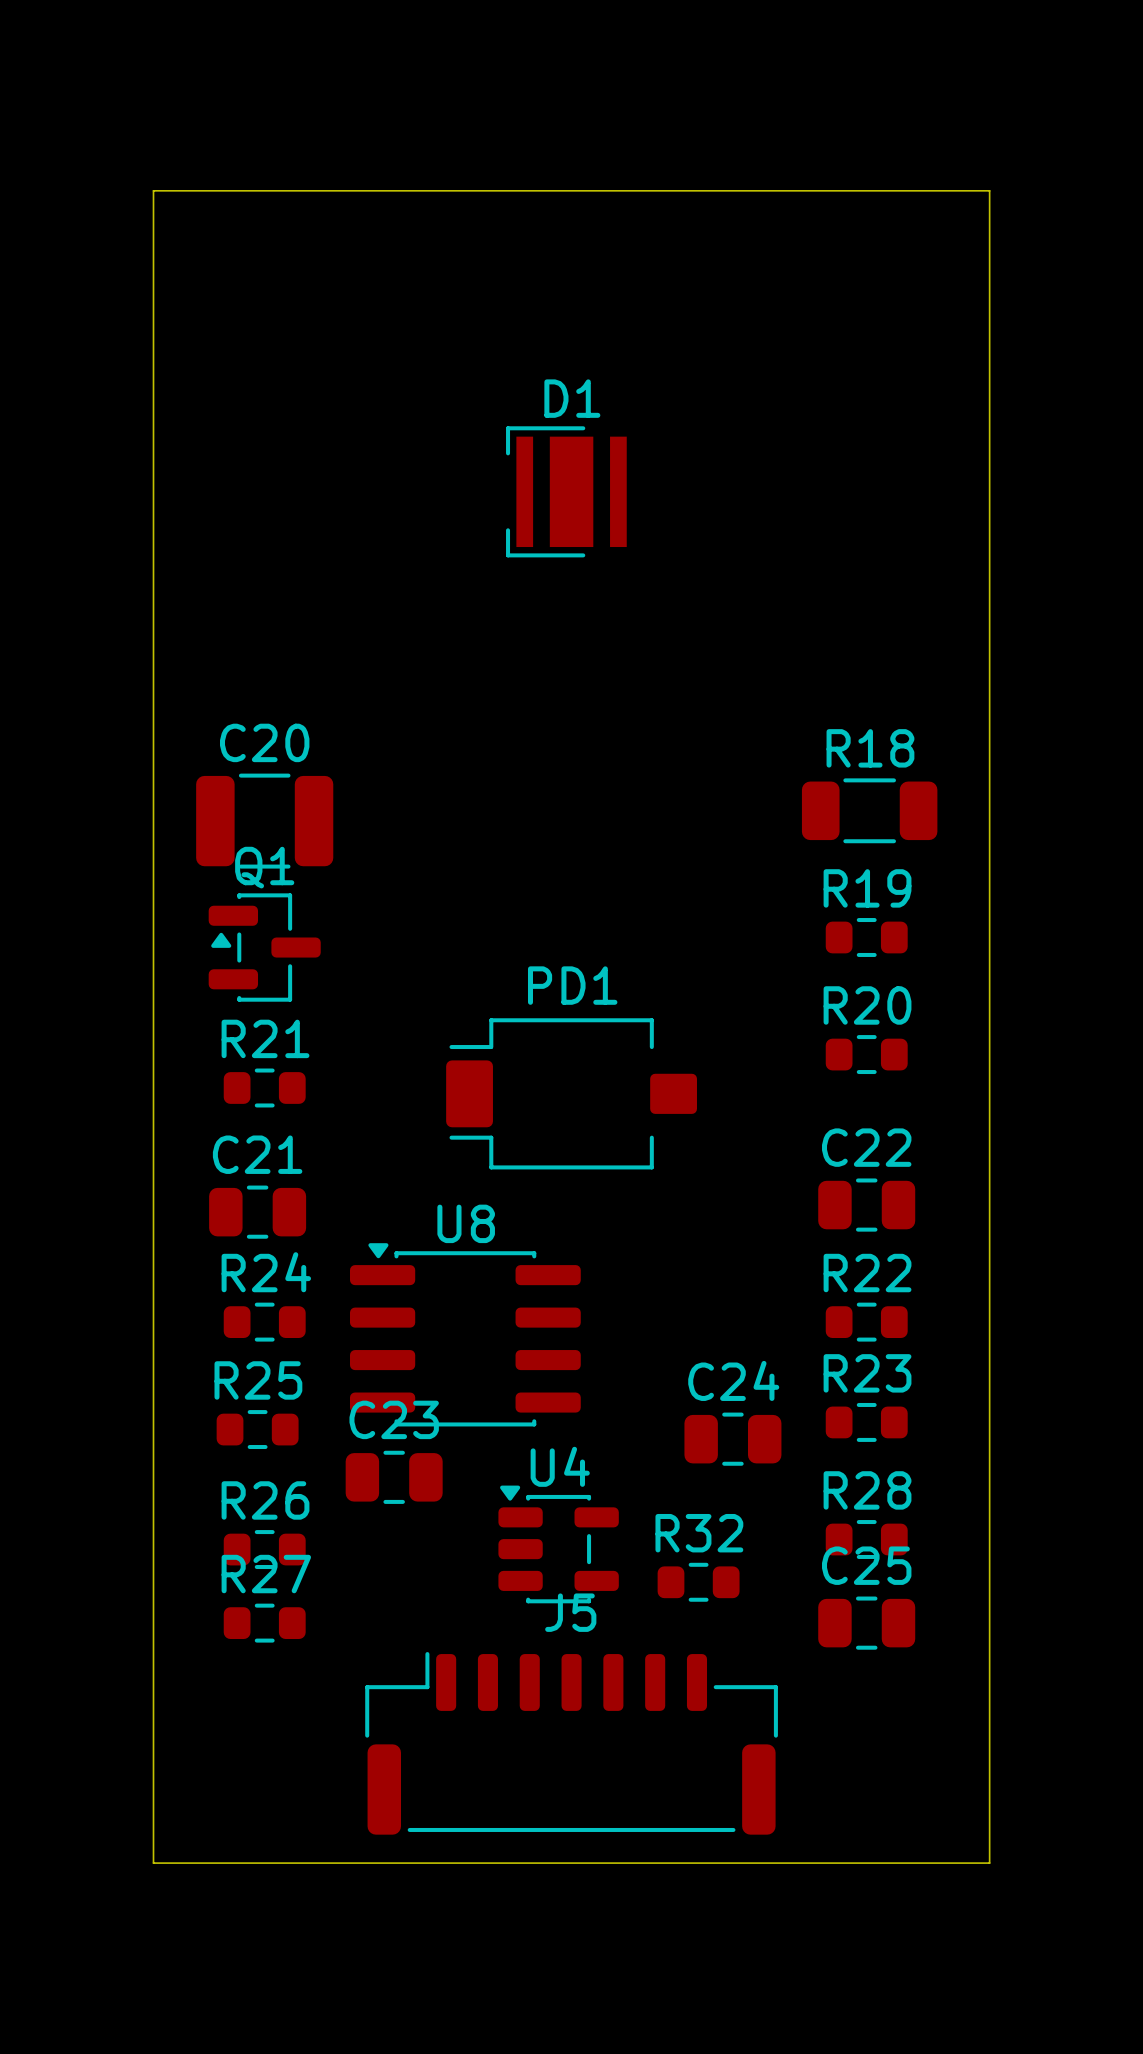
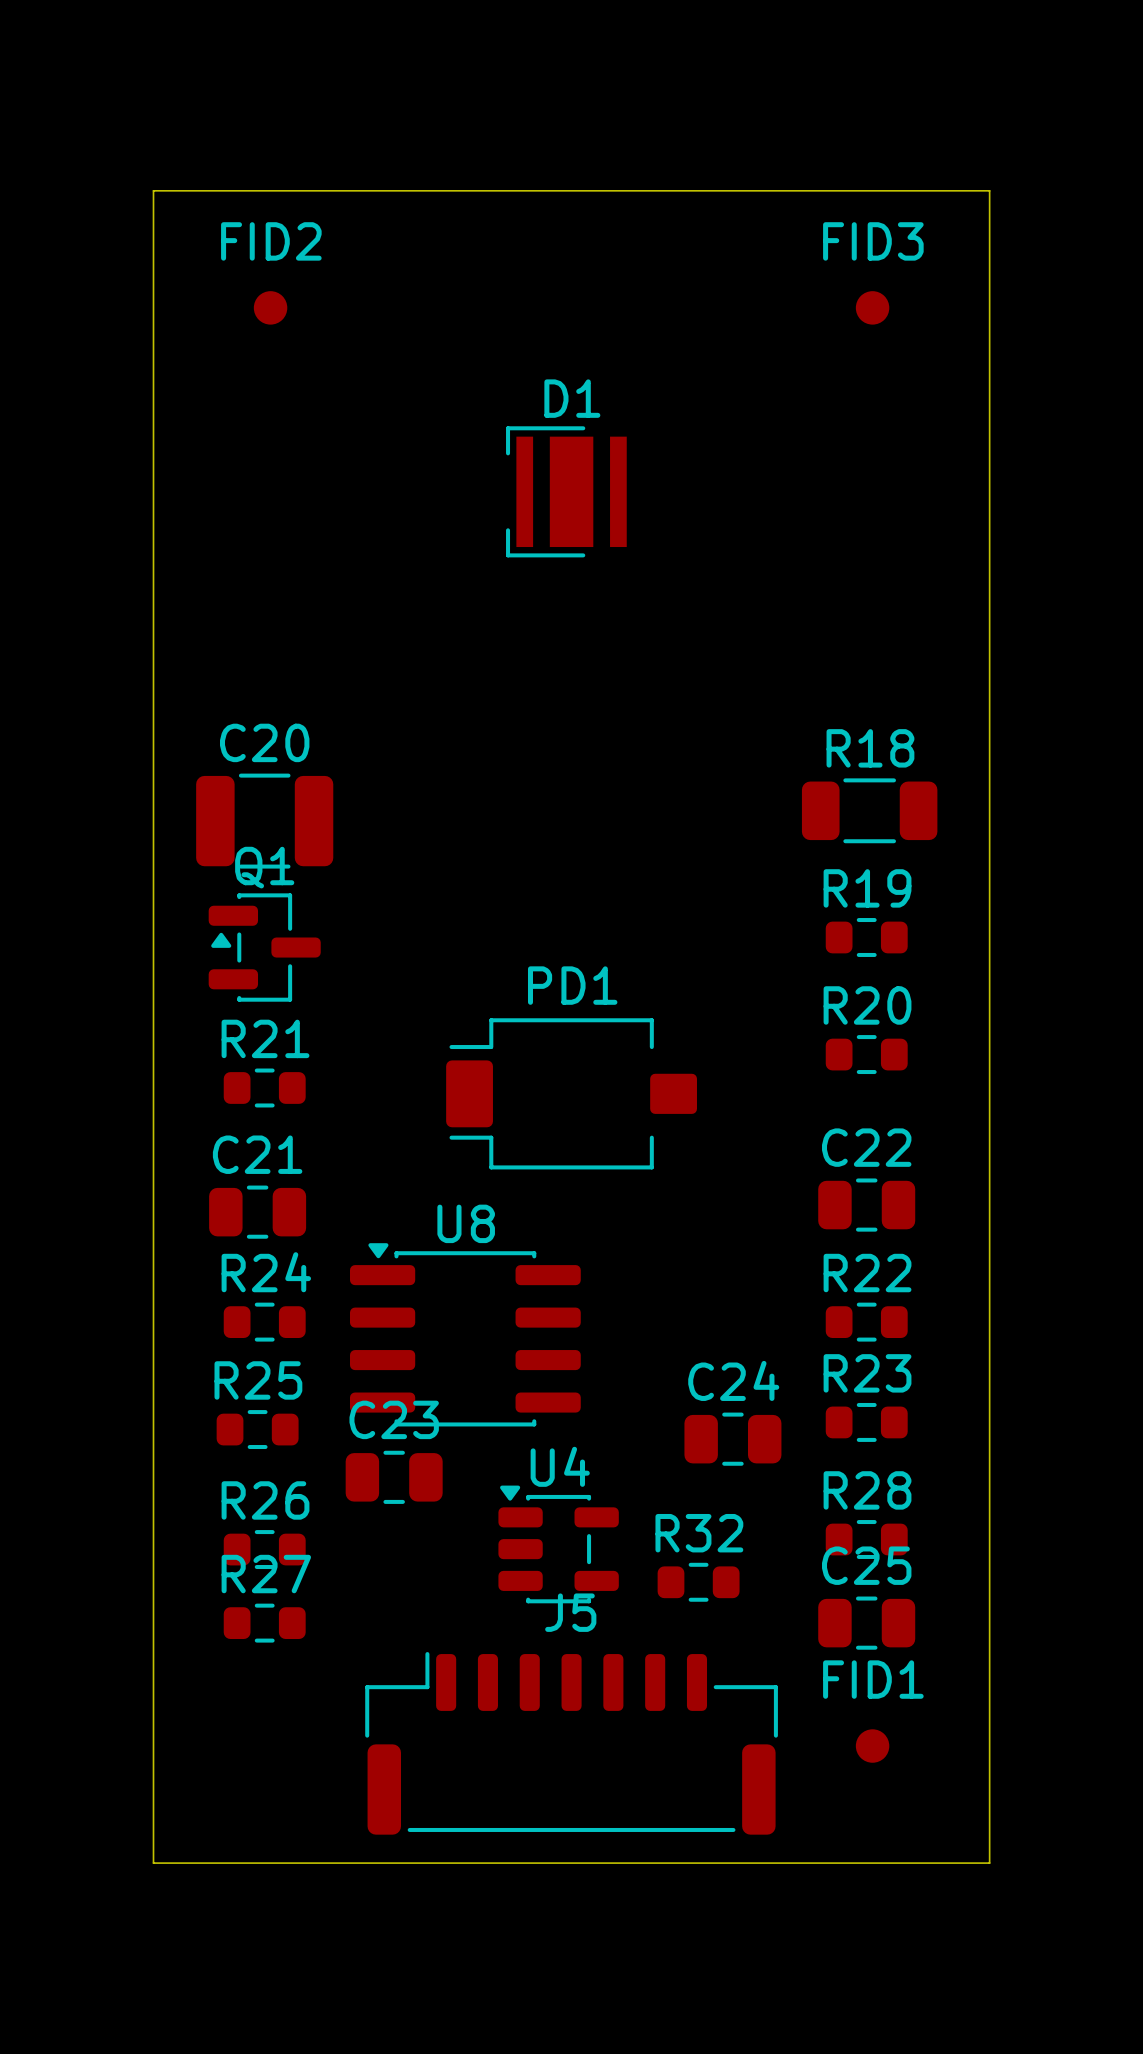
FID2: none -> (270, 307)
FID3: none -> (872, 307)
FID1: none -> (872, 1746)

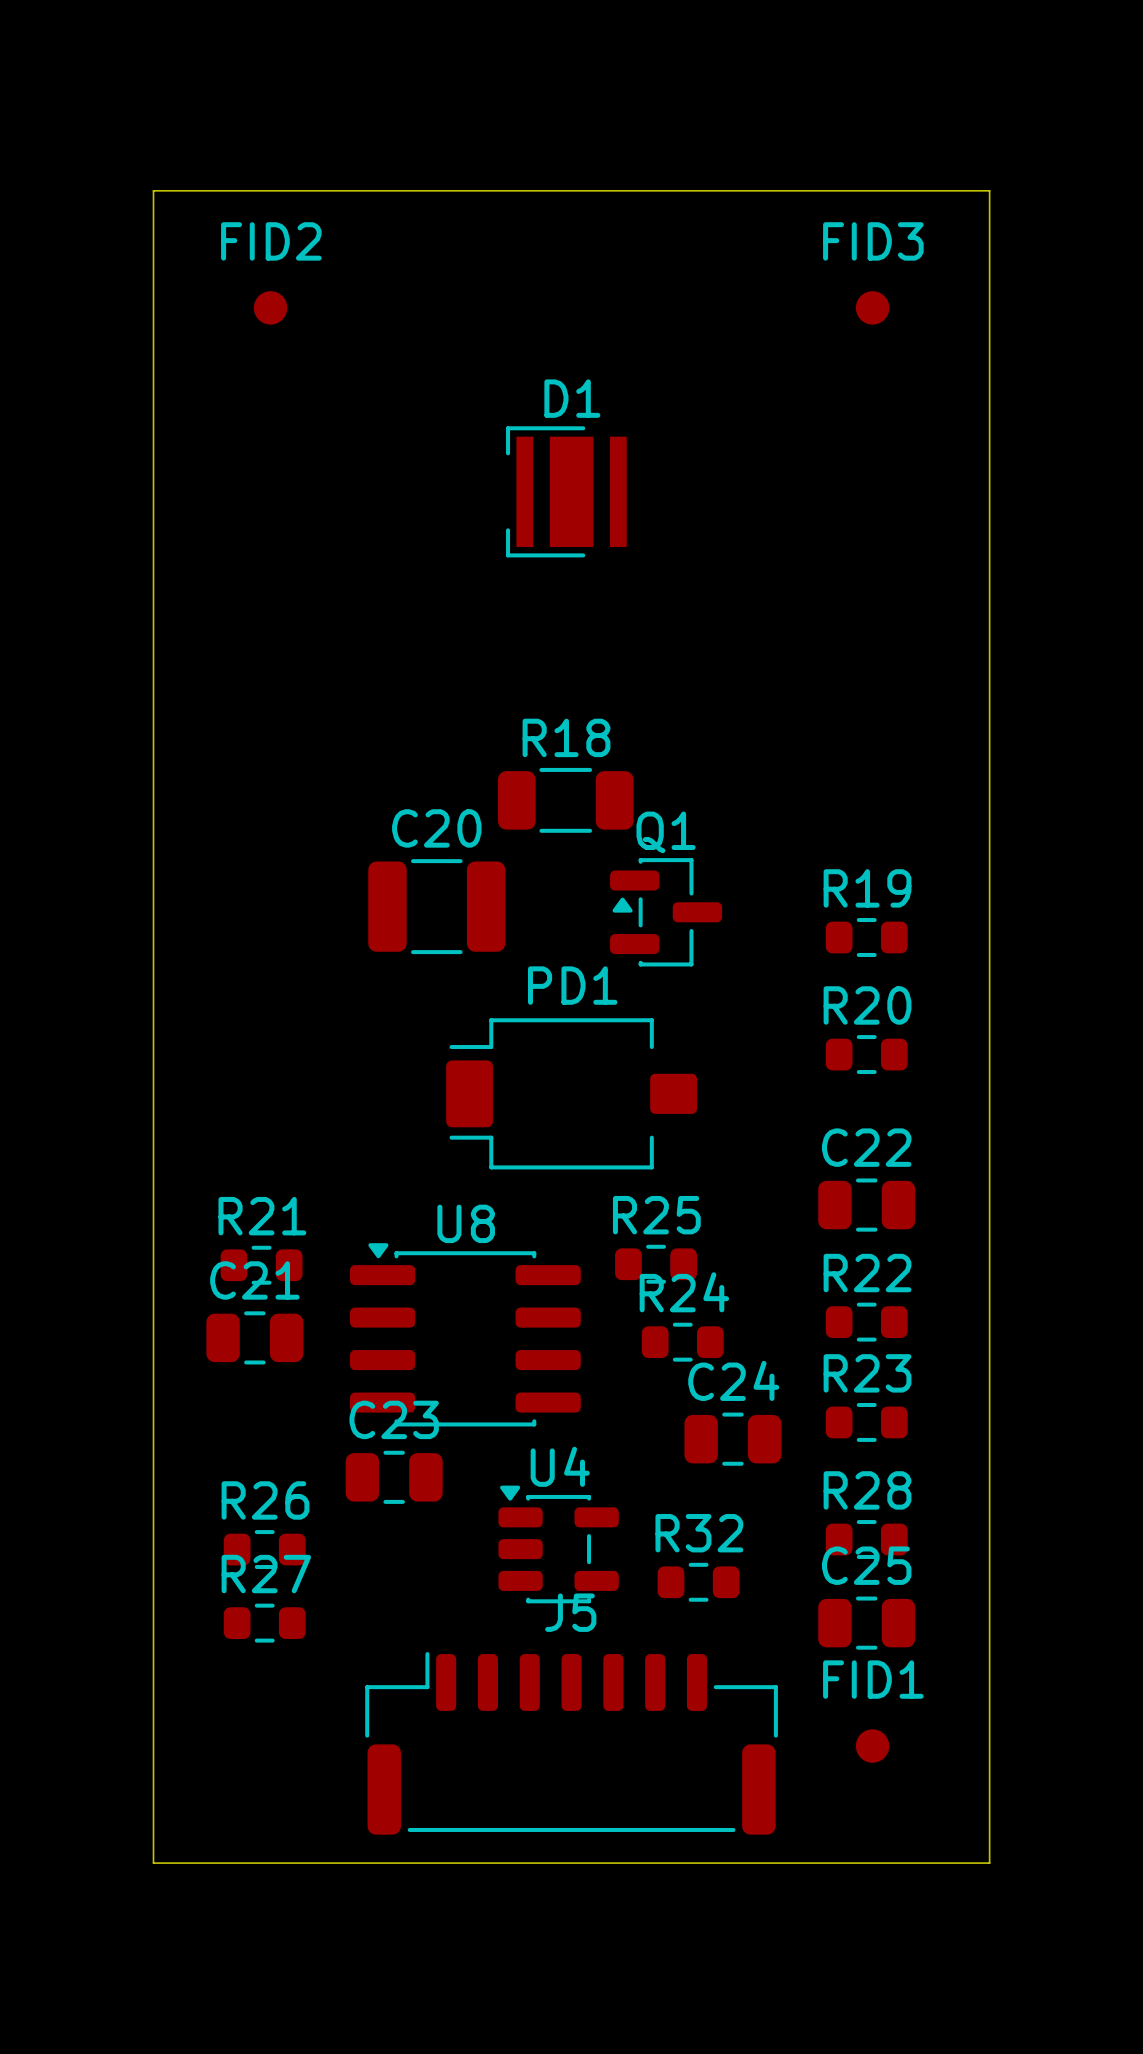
R18 position: (869, 810) -> (565, 800)
C20 position: (264, 821) -> (436, 906)
Q1 position: (264, 947) -> (666, 912)
R21 position: (264, 1087) -> (261, 1265)
C21 position: (257, 1212) -> (254, 1337)
R24 position: (264, 1322) -> (682, 1342)
R25 position: (257, 1429) -> (656, 1264)

